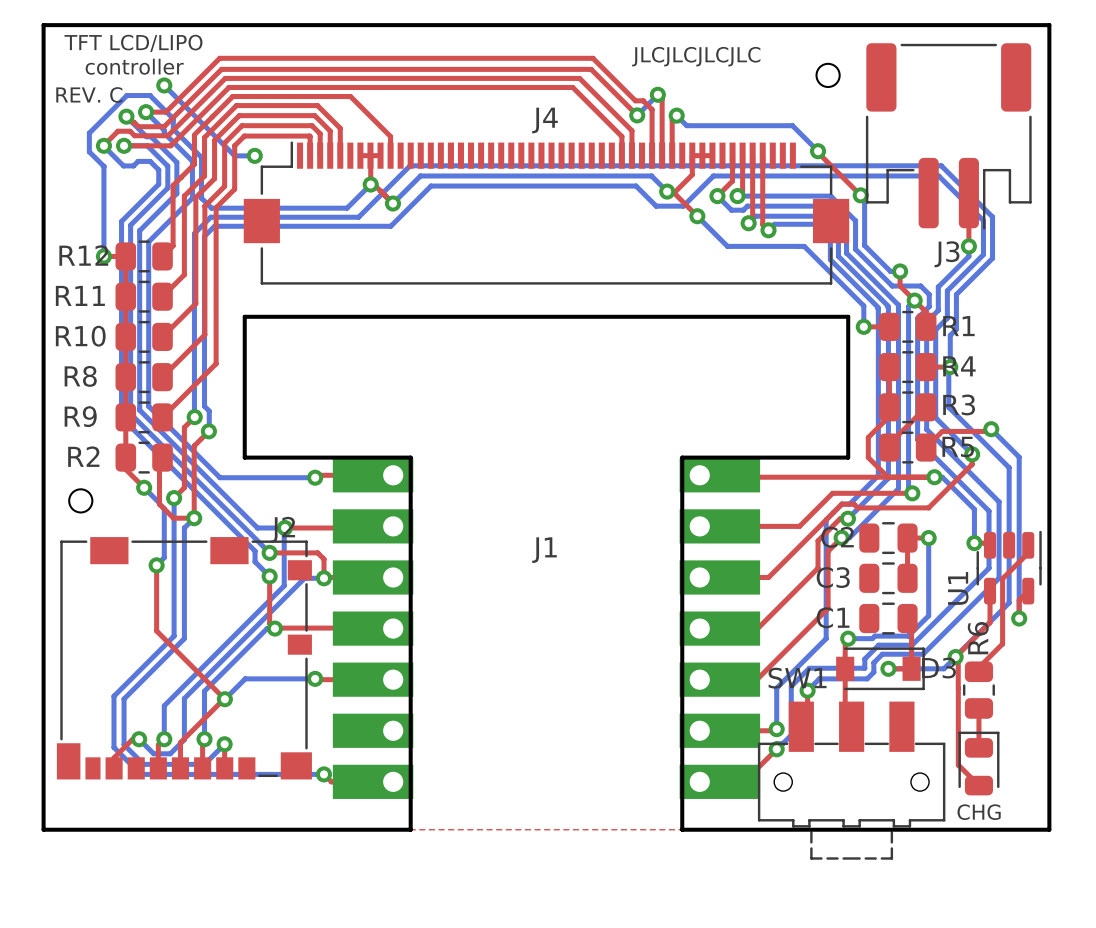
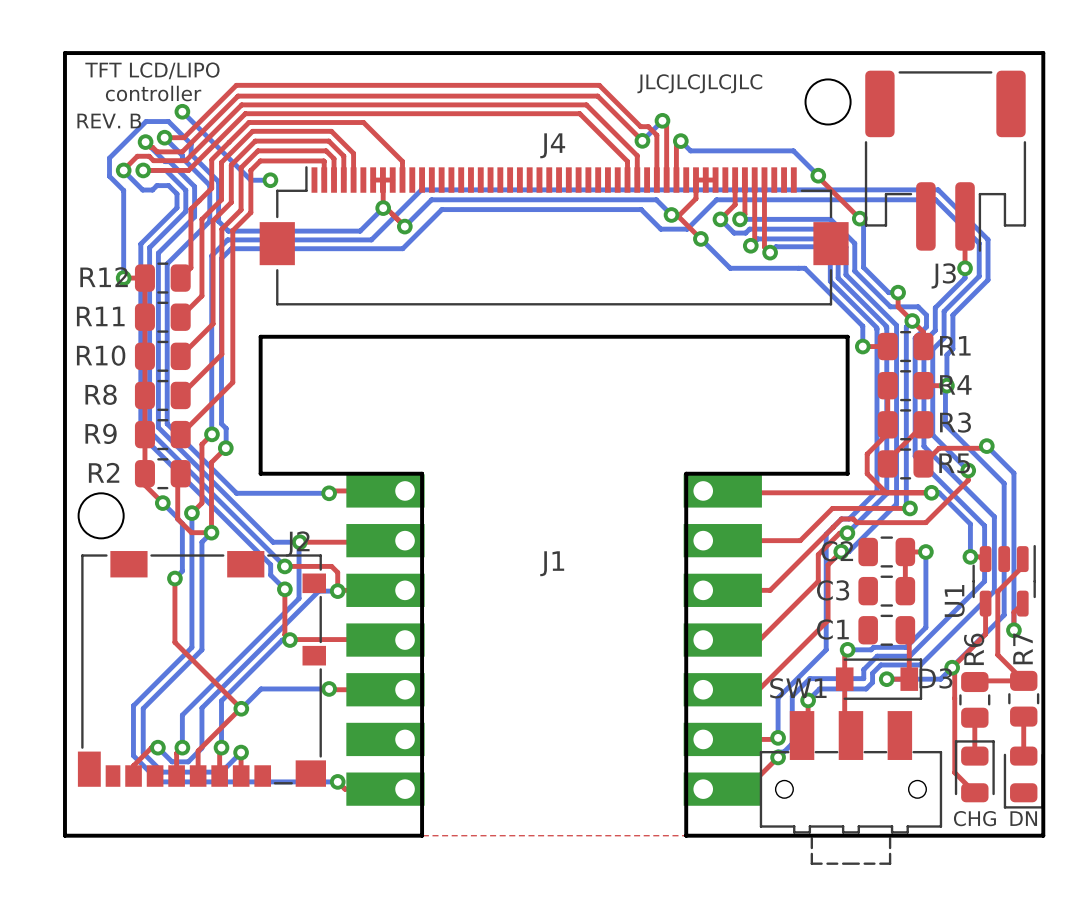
round board edge size: [815, 62, 841, 89] -> [804, 78, 852, 126]
text: REV. C (89, 94) -> REV. B (109, 120)
round board edge size: [68, 488, 94, 514] -> [77, 492, 125, 540]
top track: (1002, 643) (978, 667) (978, 671) -> (997, 654) (1023, 680)
top track: none -> (975, 680) (1023, 680)
R7: none -> (1023, 698)
top track: none -> (1023, 716) (1023, 756)
part: none -> (1023, 777)
text: none -> DN (1023, 818)

